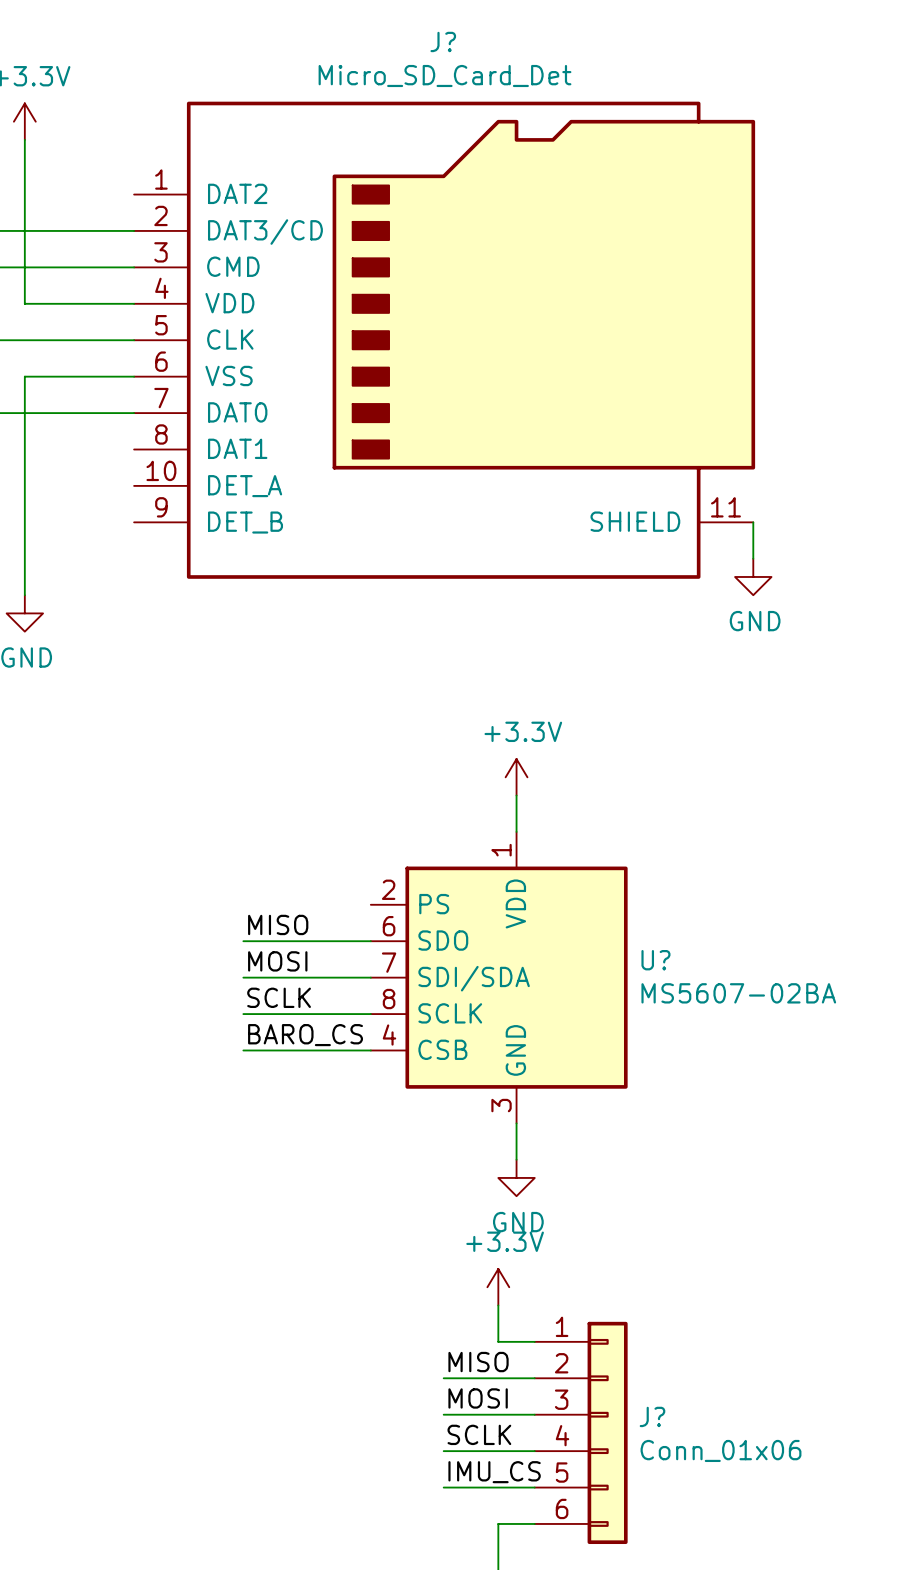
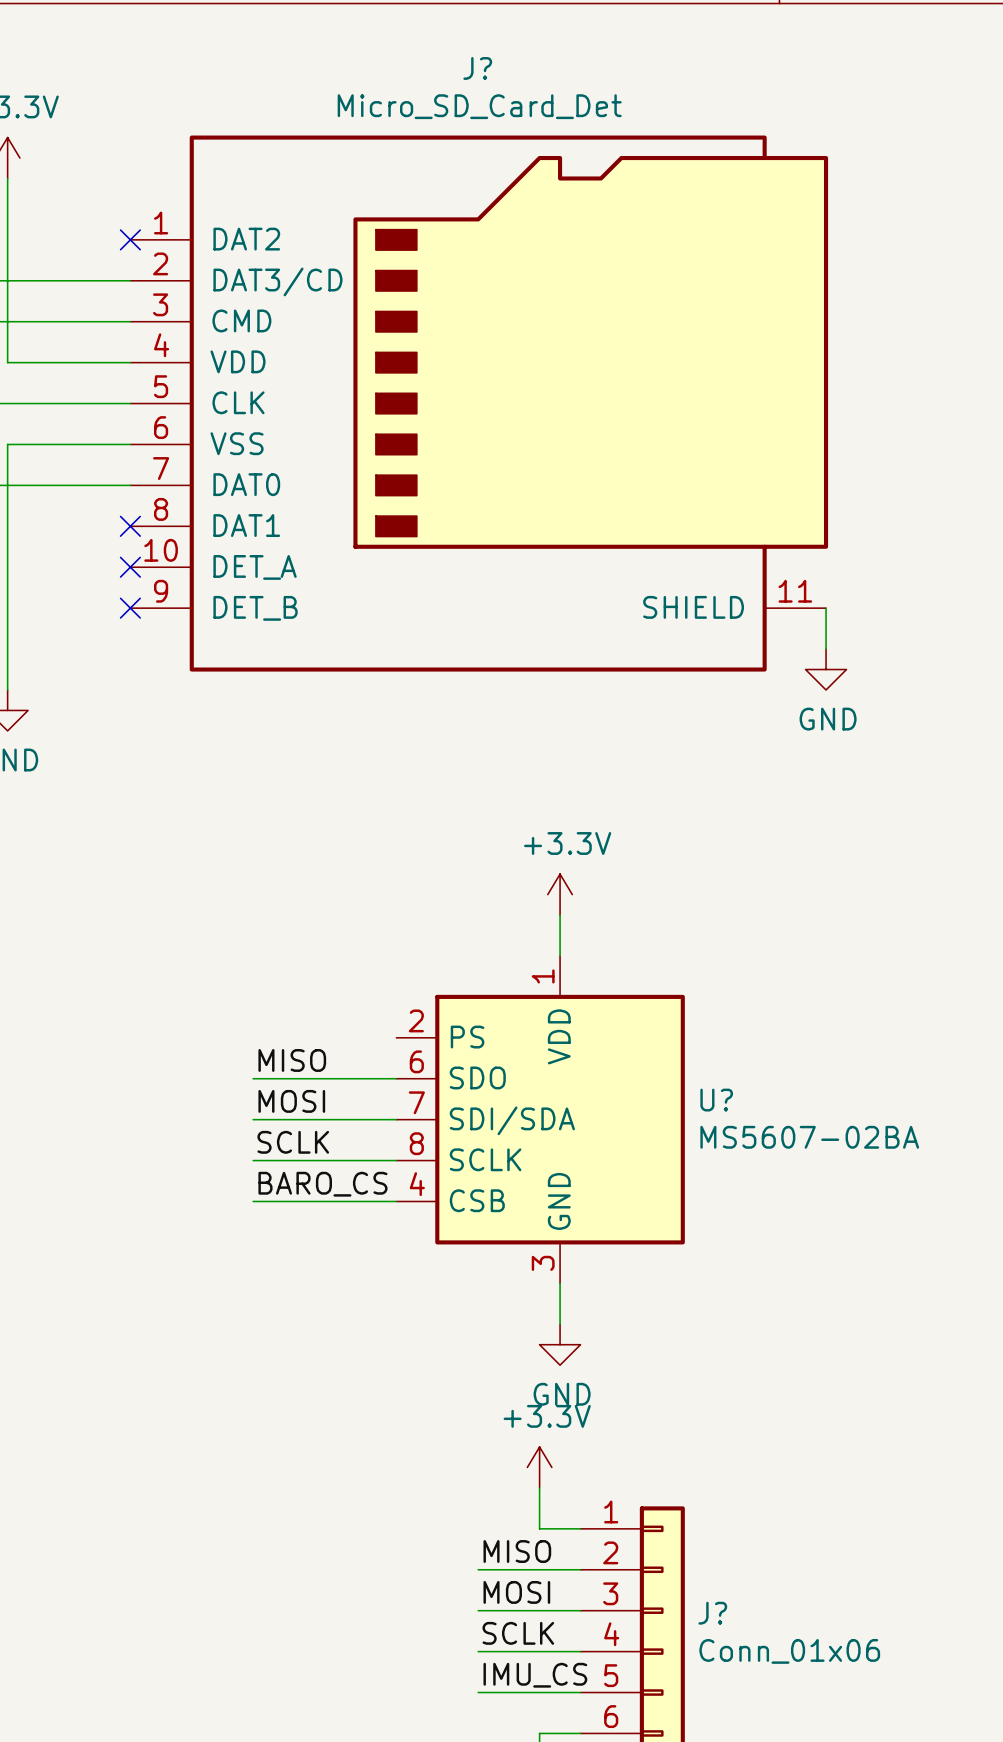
no-connect mark: none -> (130, 239)
no-connect mark: none -> (130, 526)
no-connect mark: none -> (130, 567)
no-connect mark: none -> (130, 608)

